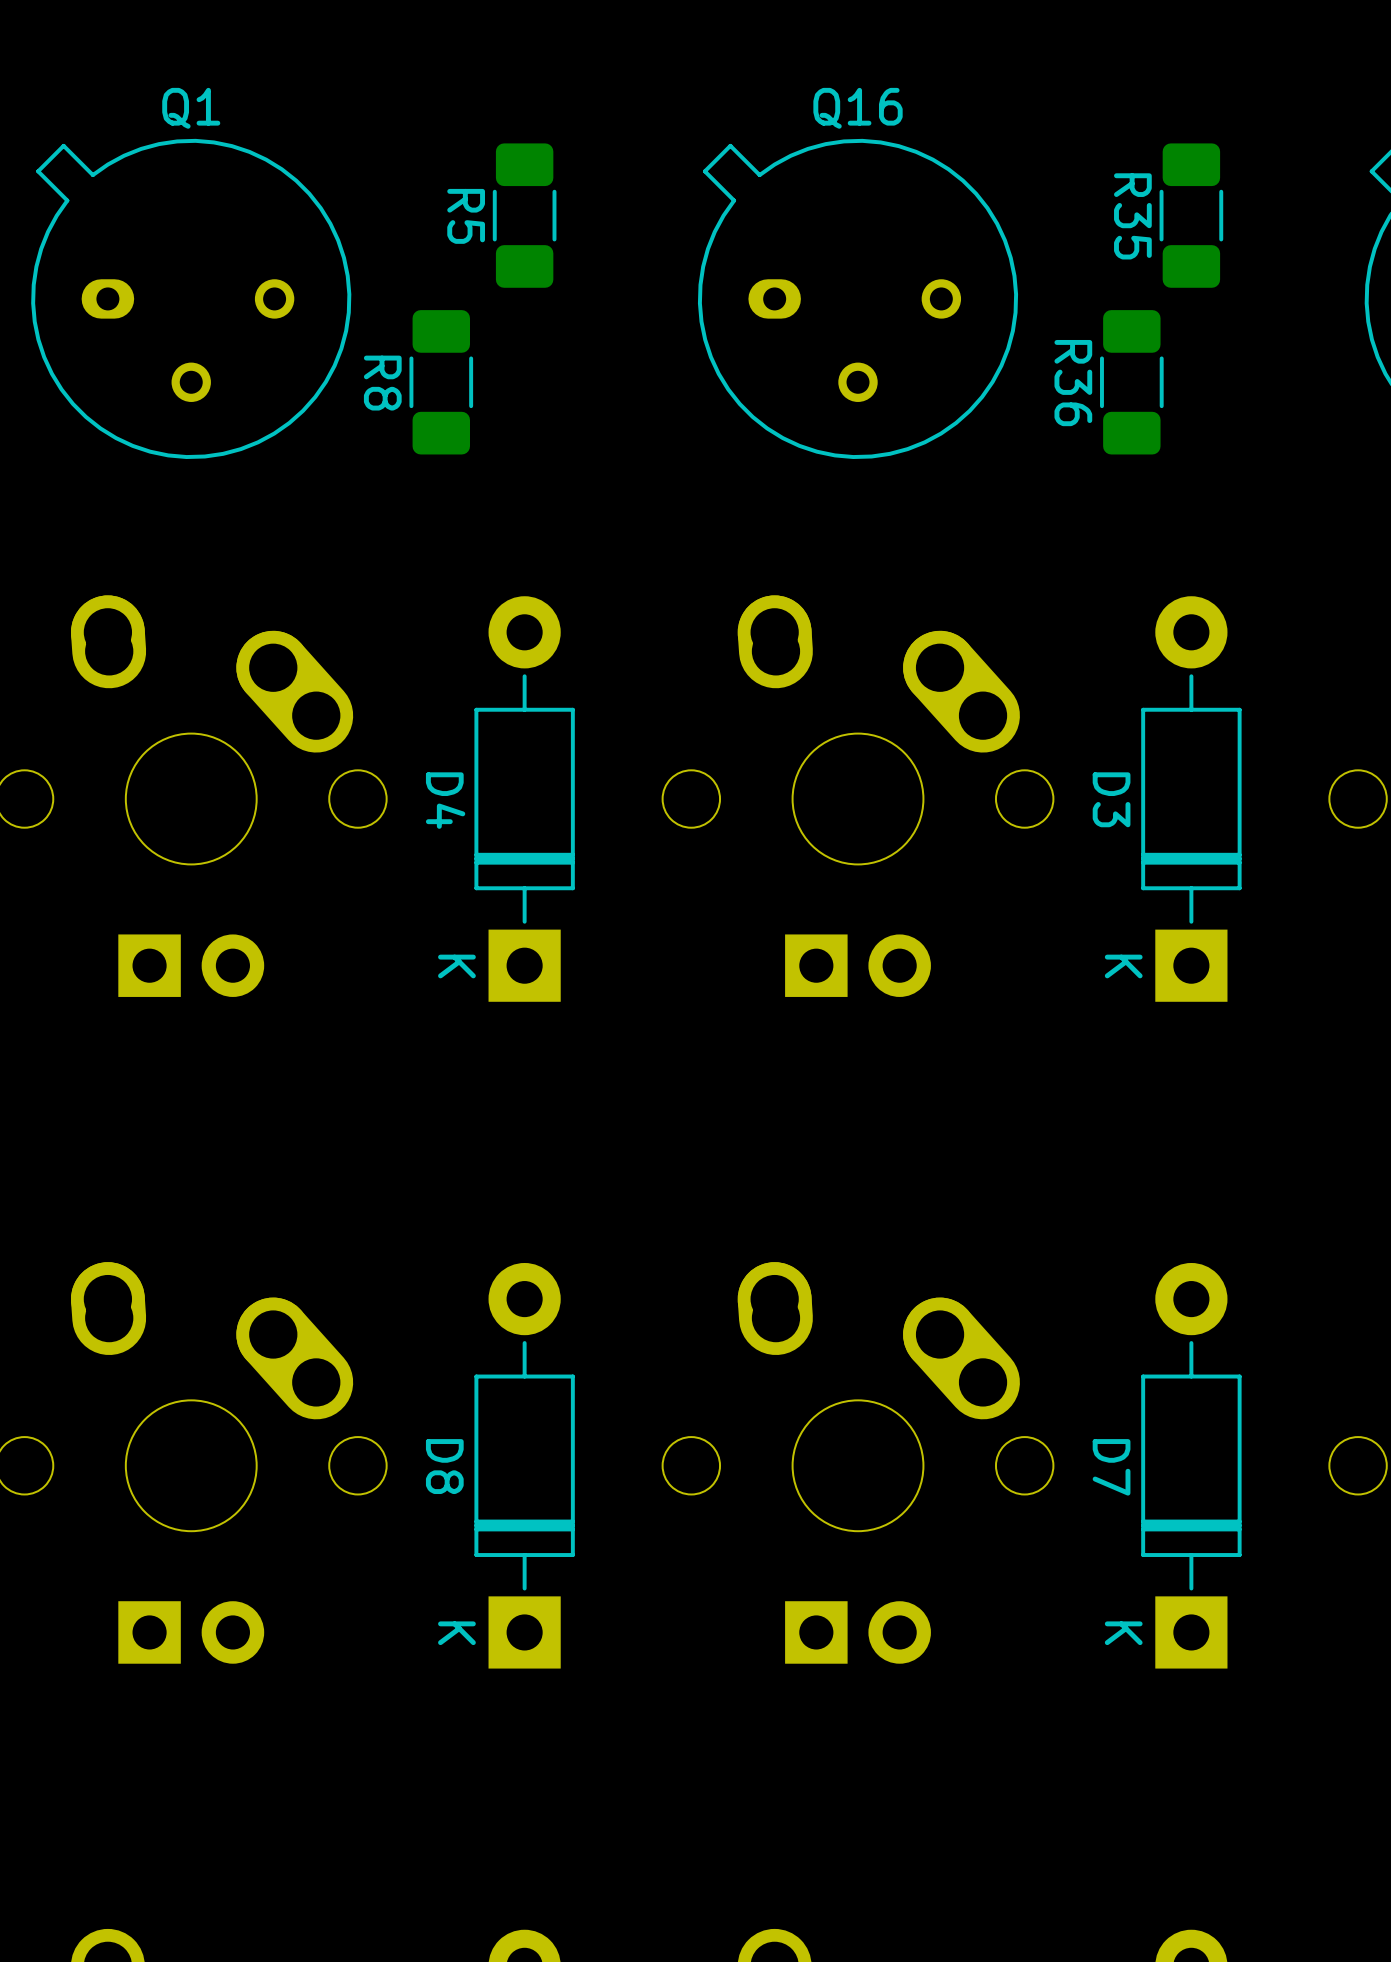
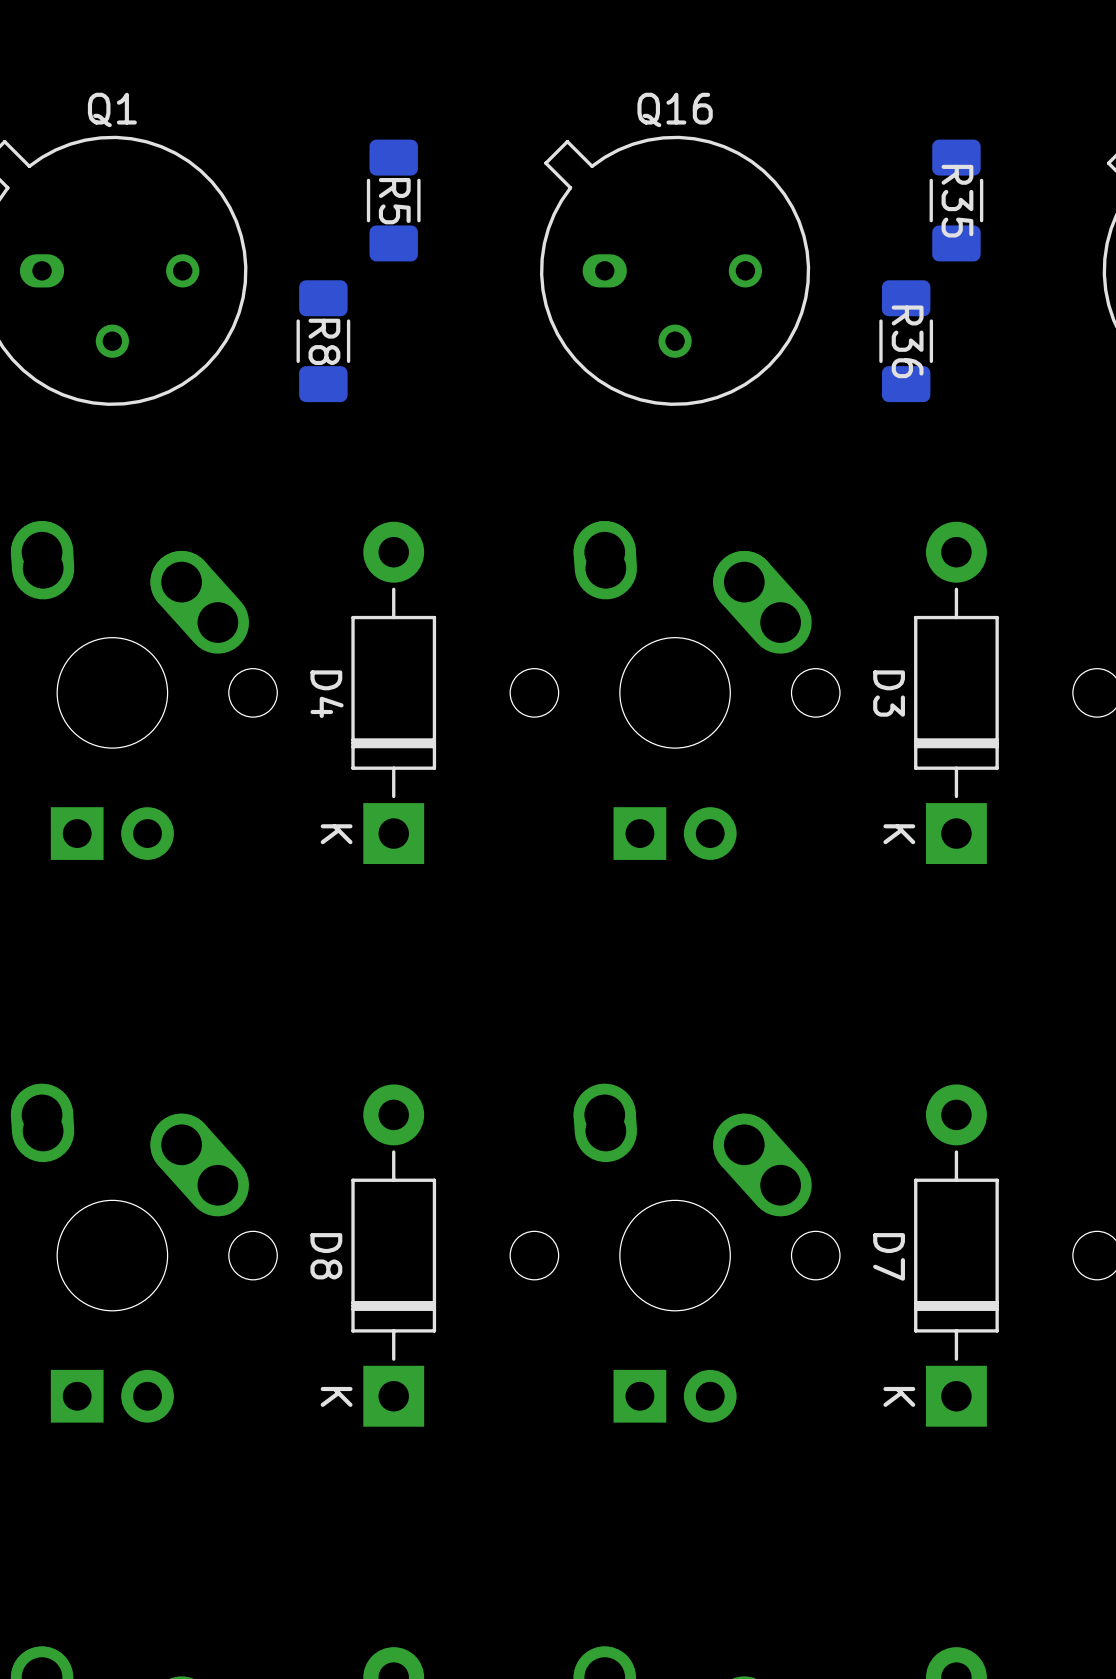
R5 name position: R5 (466, 216) -> R5 (394, 201)
R35 name position: R35 (1132, 216) -> R35 (957, 201)
R8 name position: R8 (382, 383) -> R8 (324, 341)
R36 name position: R36 (1073, 383) -> R36 (907, 341)

